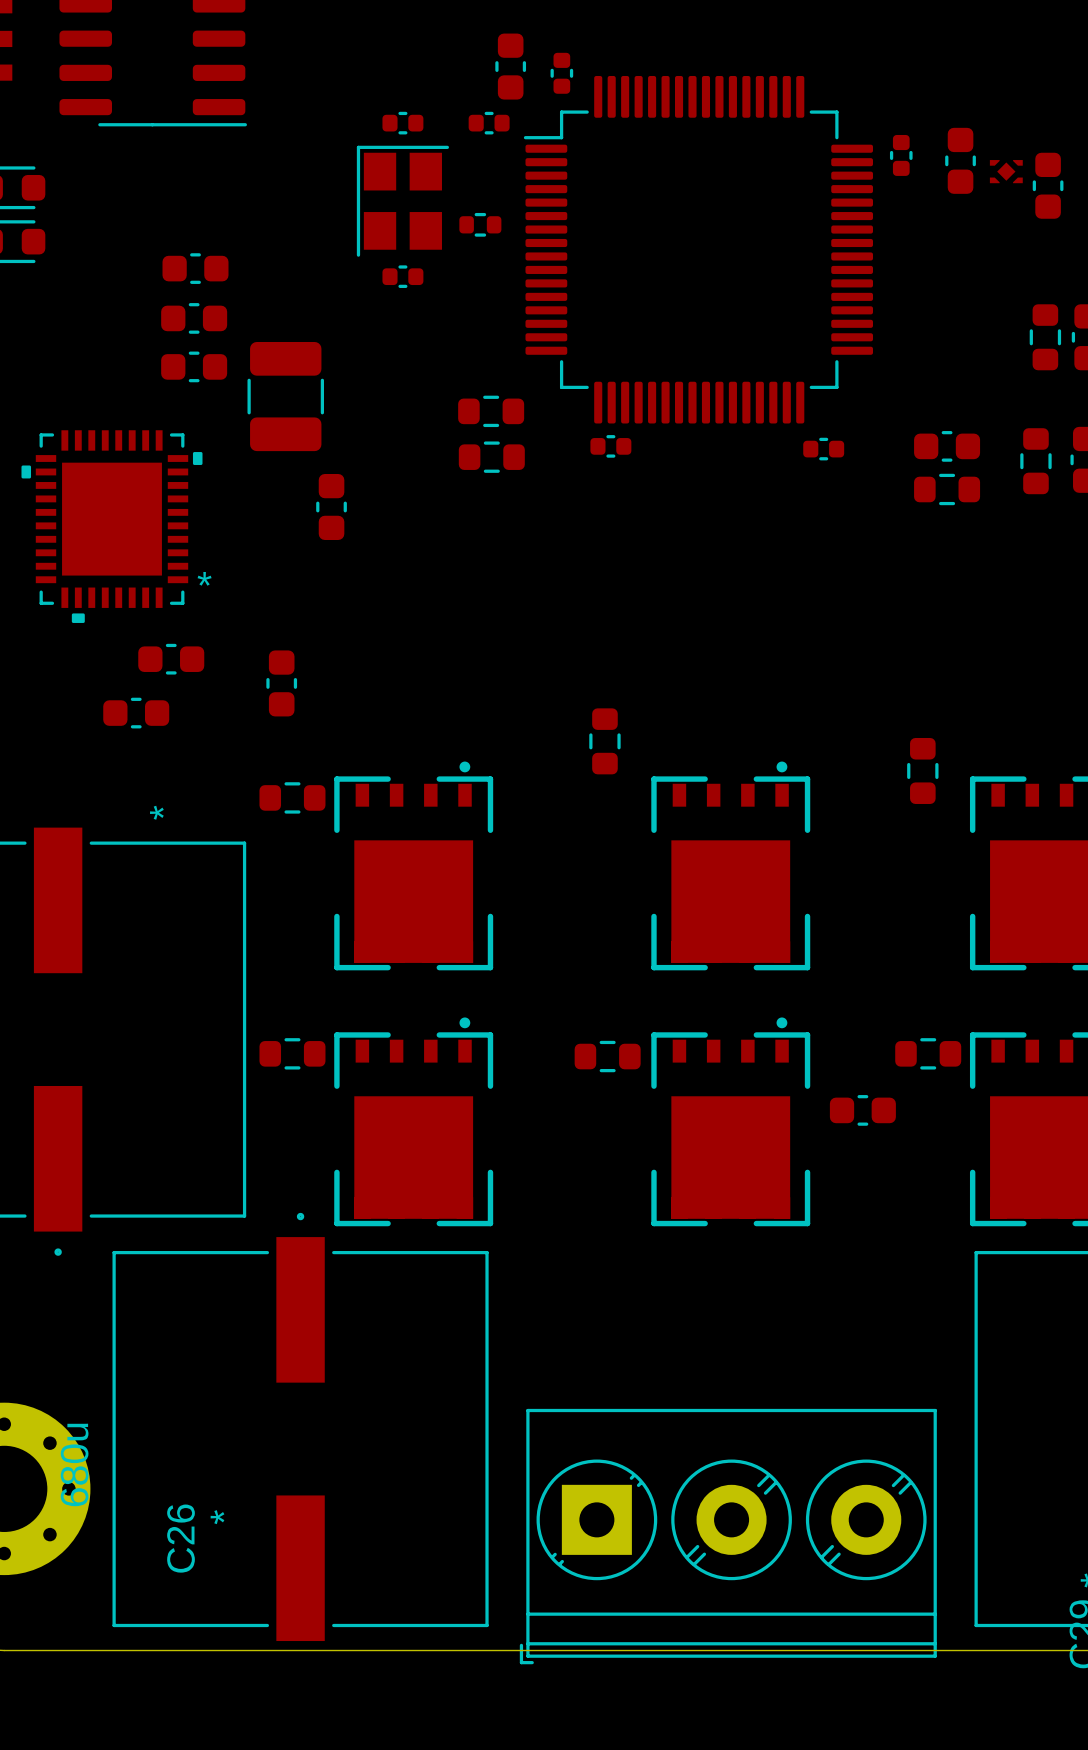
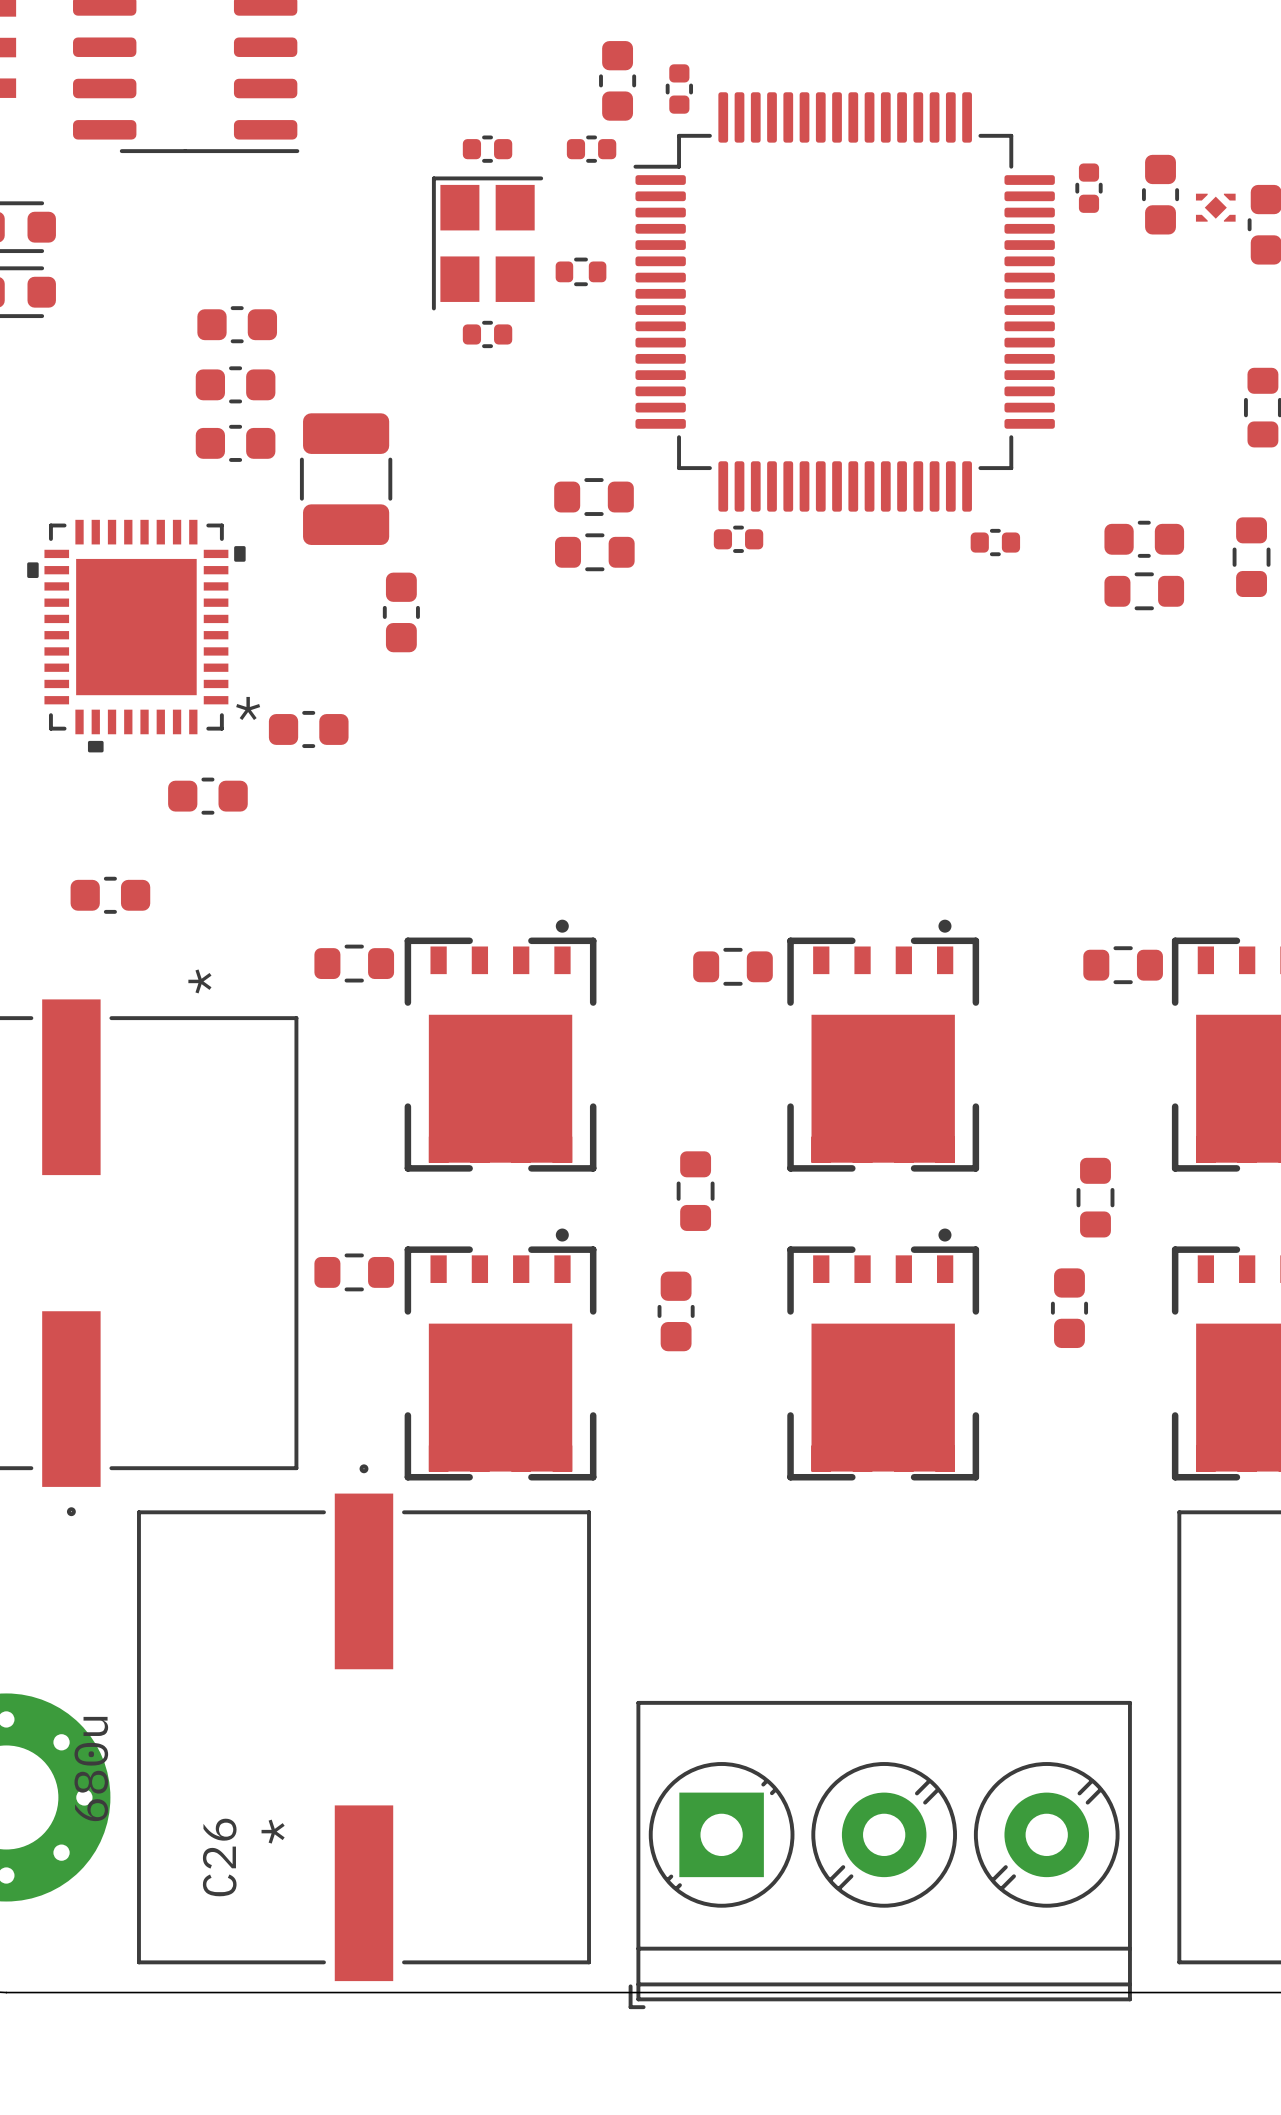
part: none -> (308, 729)
part: (281, 683) -> none
part position: (136, 713) -> (110, 895)
part rotation: 0° (604, 741) -> 90° clockwise (732, 966)
part position: (604, 741) -> (732, 966)
part rotation: 0° (922, 770) -> 90° clockwise (1123, 965)
part rotation: 0° (928, 1053) -> 90° clockwise (1095, 1197)
part position: (928, 1053) -> (1095, 1197)
part rotation: 0° (607, 1056) -> 90° clockwise (695, 1191)
part position: (607, 1056) -> (695, 1191)
part: none -> (676, 1311)
part rotation: 0° (862, 1110) -> 90° clockwise (1069, 1308)

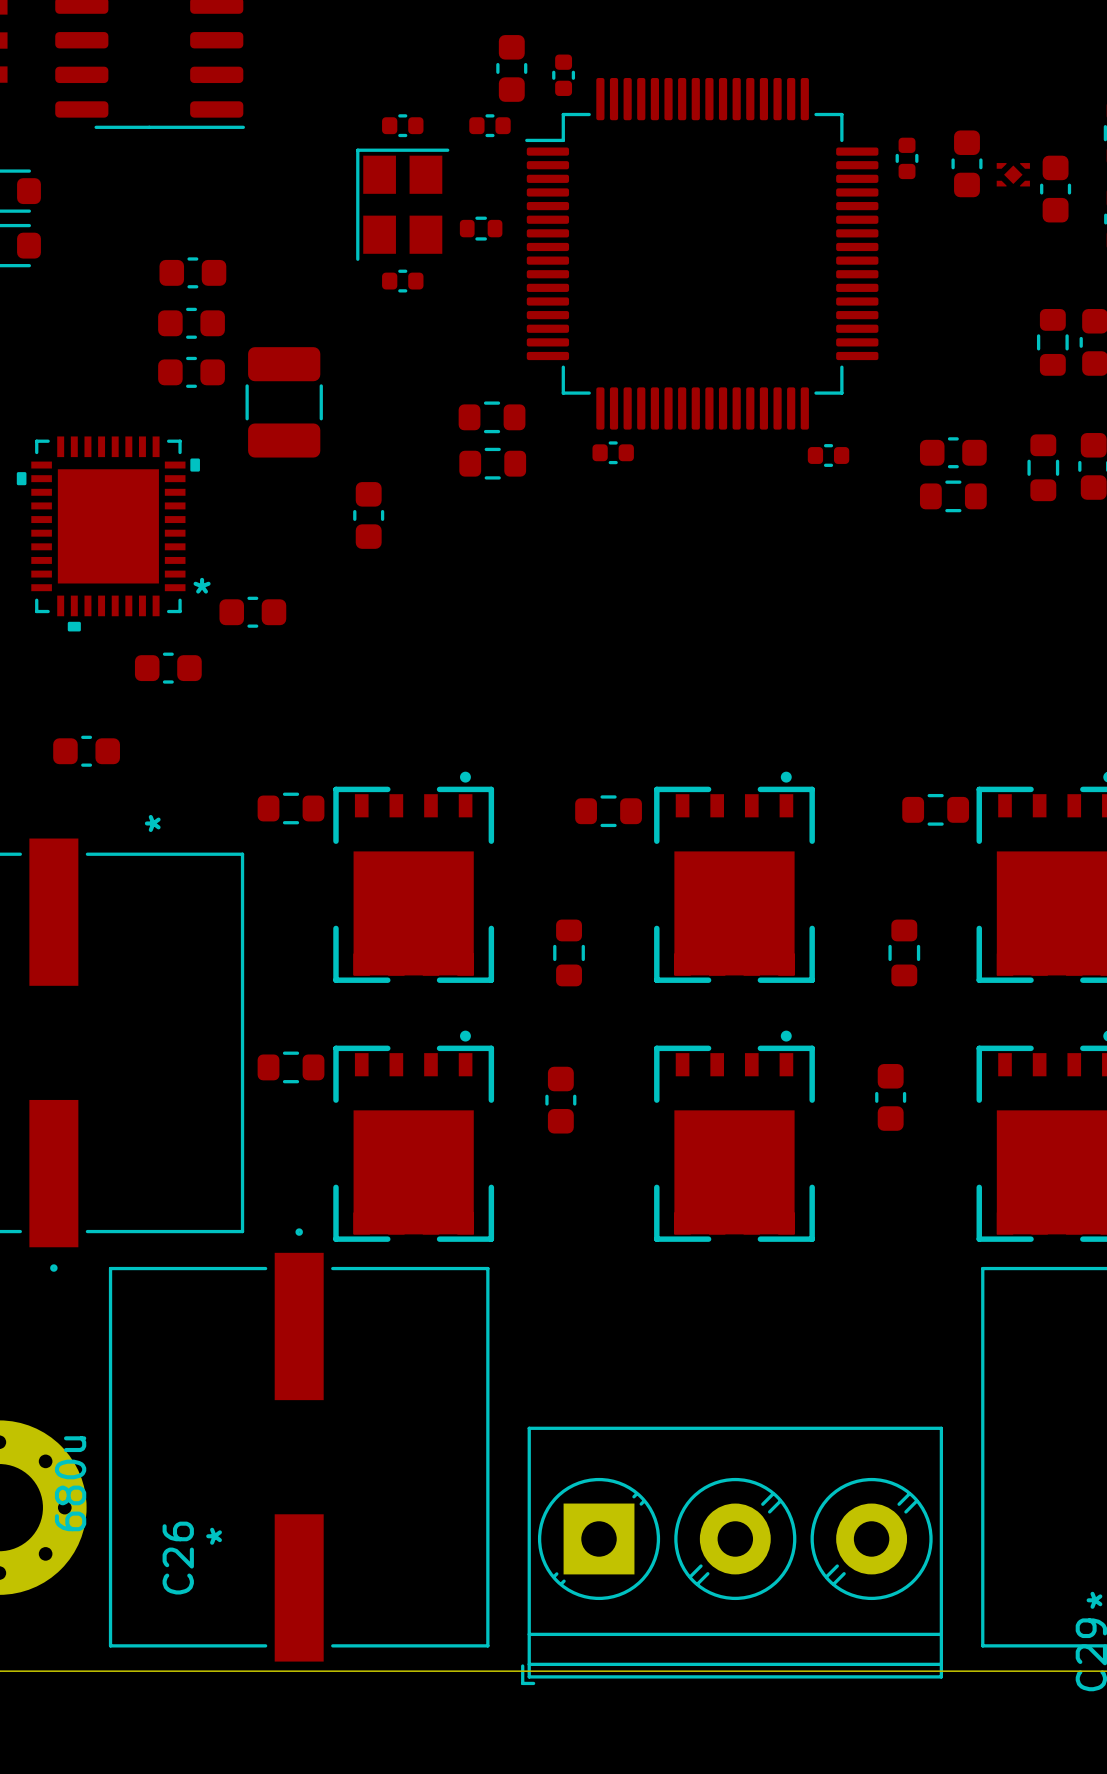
part position: (401, 612) -> (368, 515)
part position: (695, 1191) -> (569, 952)
part position: (1095, 1197) -> (904, 952)

